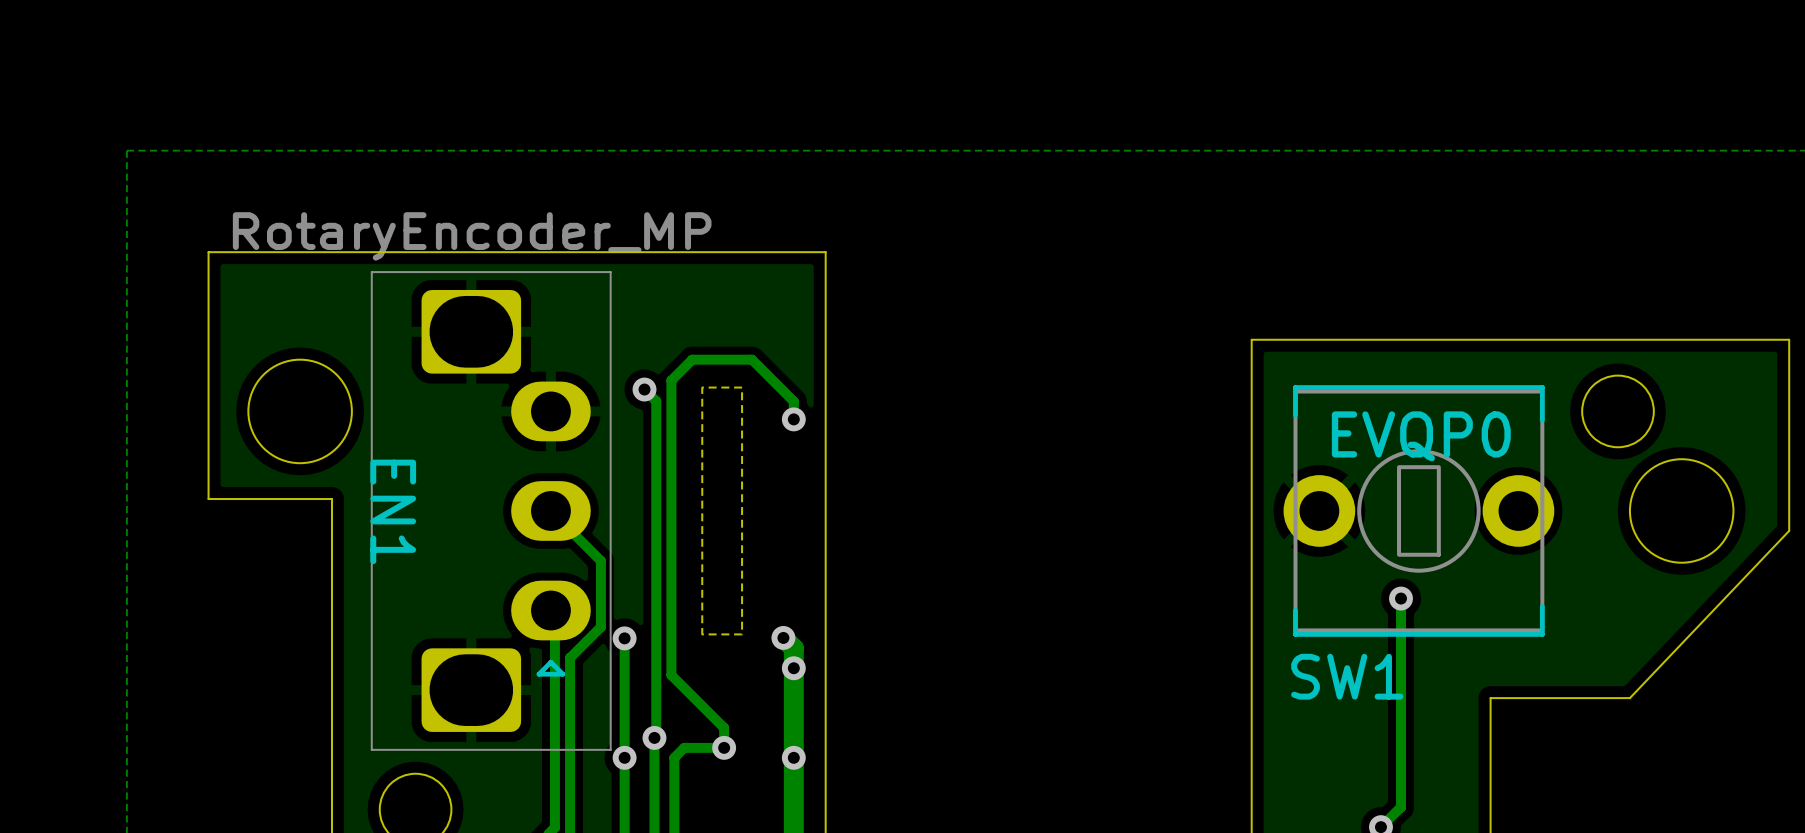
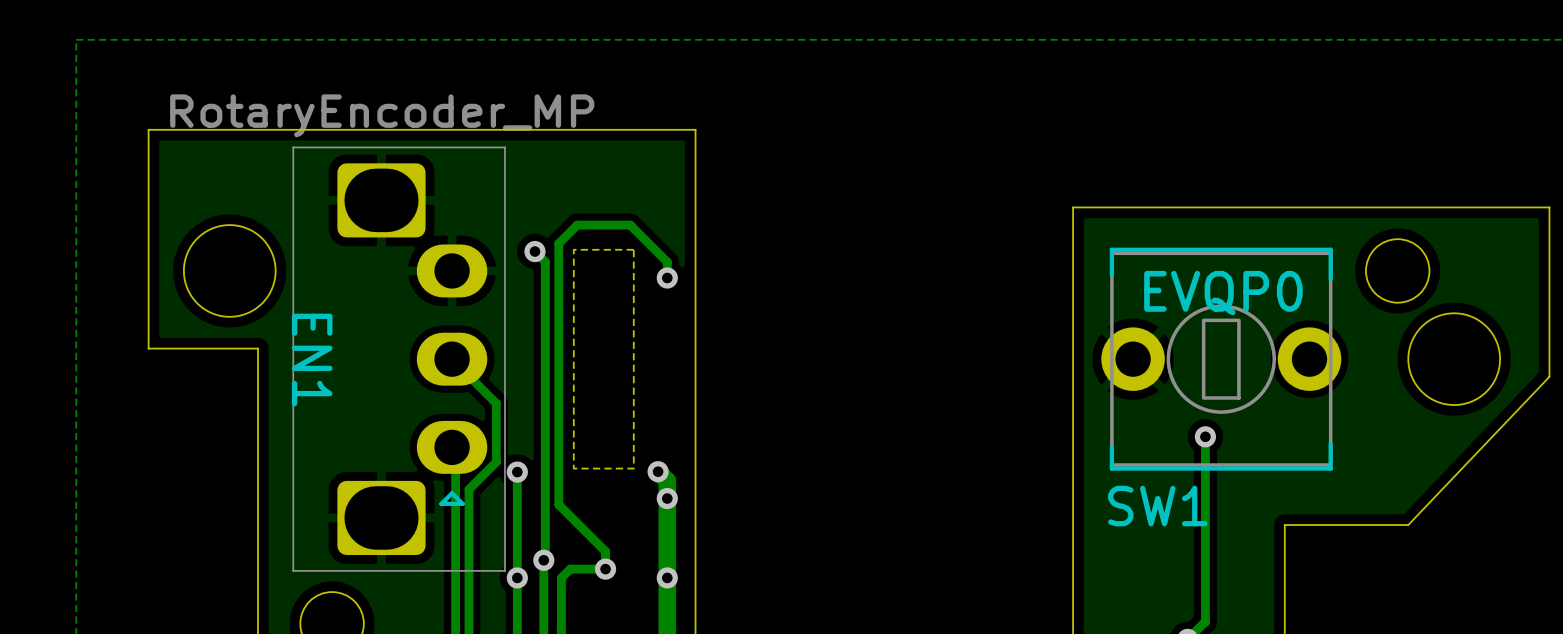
part footprint: [701, 386, 744, 636] -> [572, 248, 635, 470]

